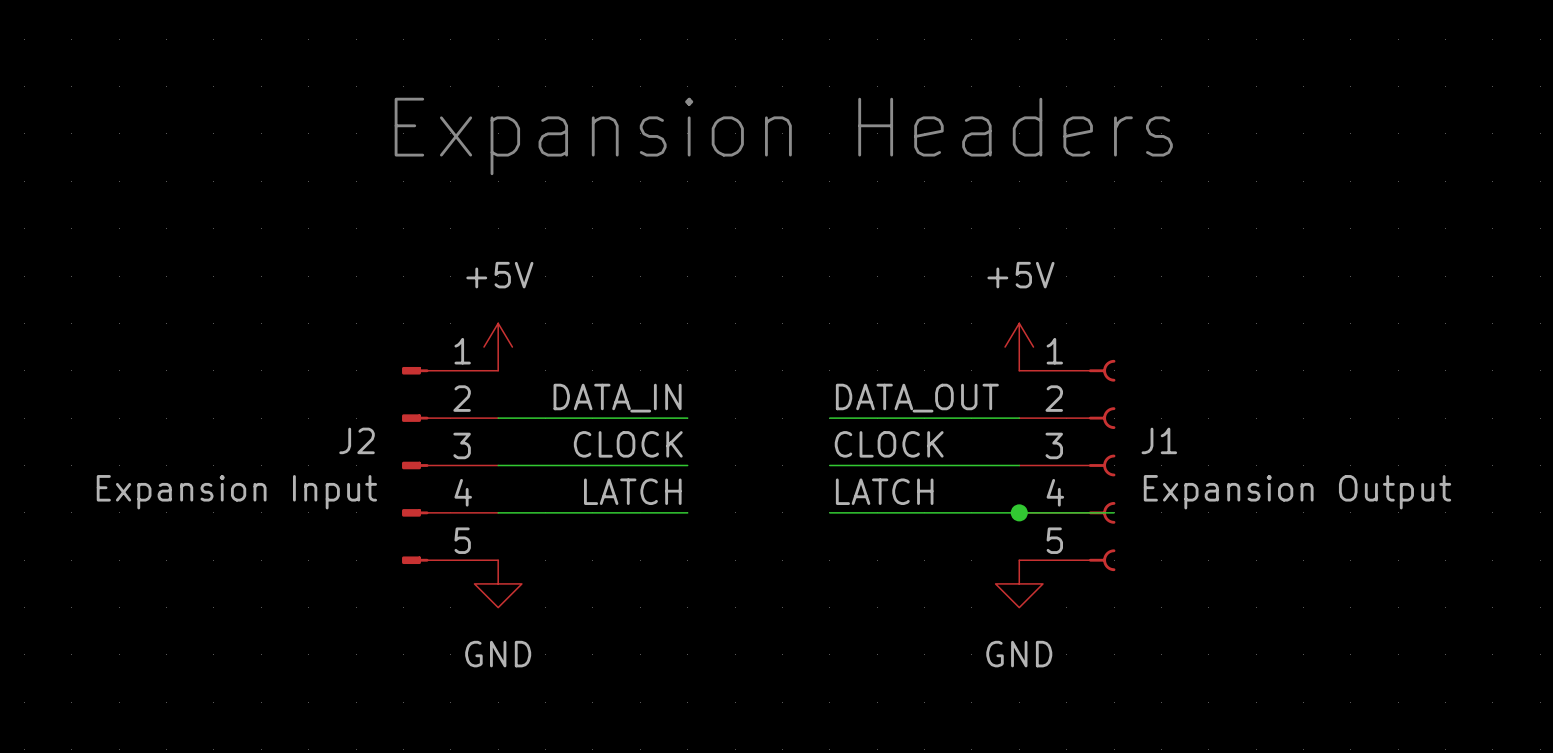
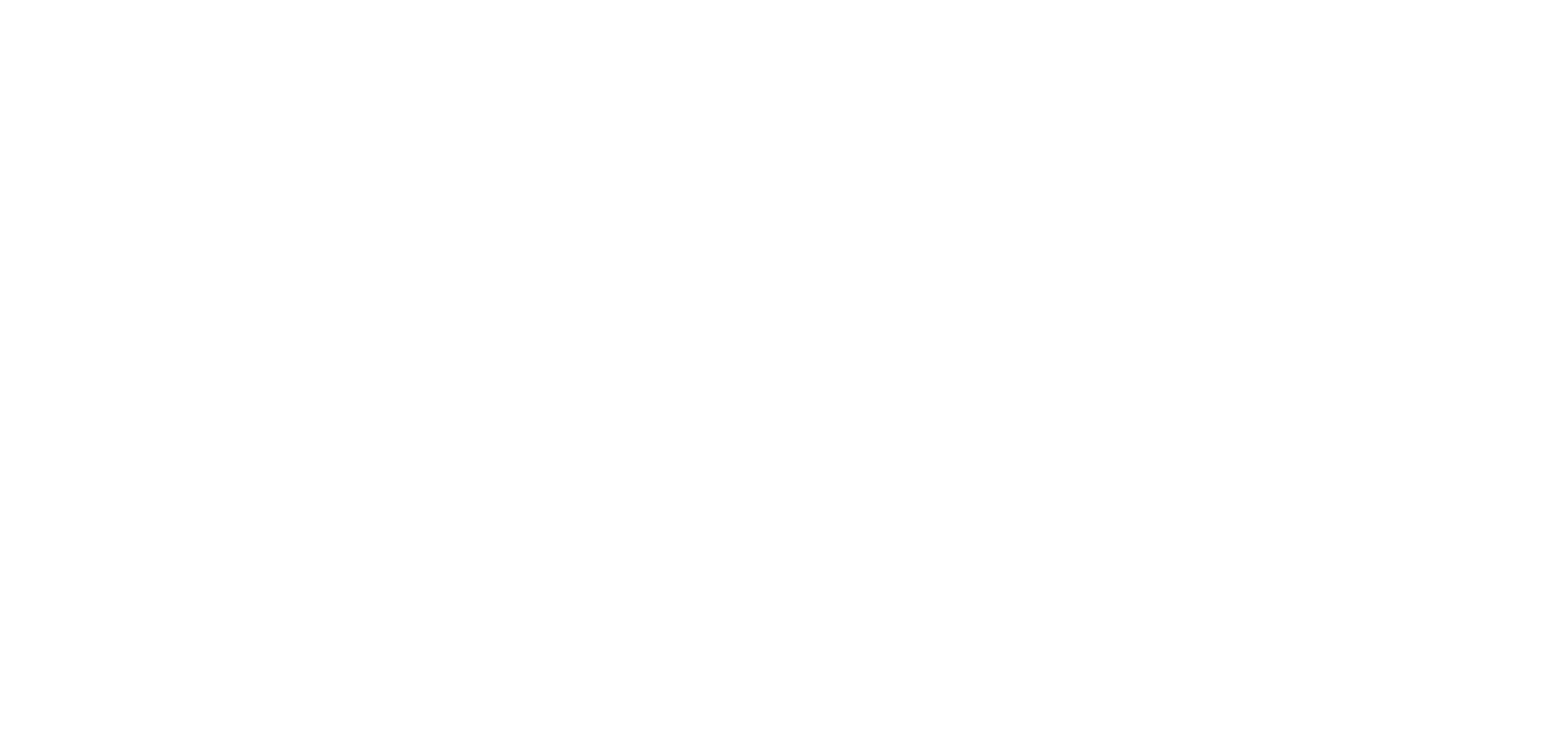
text: Expansion Headers (783, 136) -> none
power symbol: +5V (498, 347) -> none
power symbol: +5V (1019, 347) -> none
label: DATA_IN (617, 398) -> none
label: DATA_OUT (917, 398) -> none
wire: (498, 418) (687, 418) -> none
wire: (829, 418) (1019, 418) -> none
label: CLOCK (628, 444) -> none
label: CLOCK (889, 444) -> none
J2: Expansion Input (450, 465) -> none
wire: (498, 465) (687, 465) -> none
wire: (829, 465) (1019, 465) -> none
J1: Expansion Output (1067, 465) -> none
label: LATCH (632, 491) -> none
label: LATCH (884, 491) -> none
wire: (498, 512) (687, 512) -> none
wire: (829, 512) (1114, 512) -> none
junction: (1019, 512) -> none
power symbol: GND (498, 583) -> none
power symbol: GND (1019, 583) -> none

